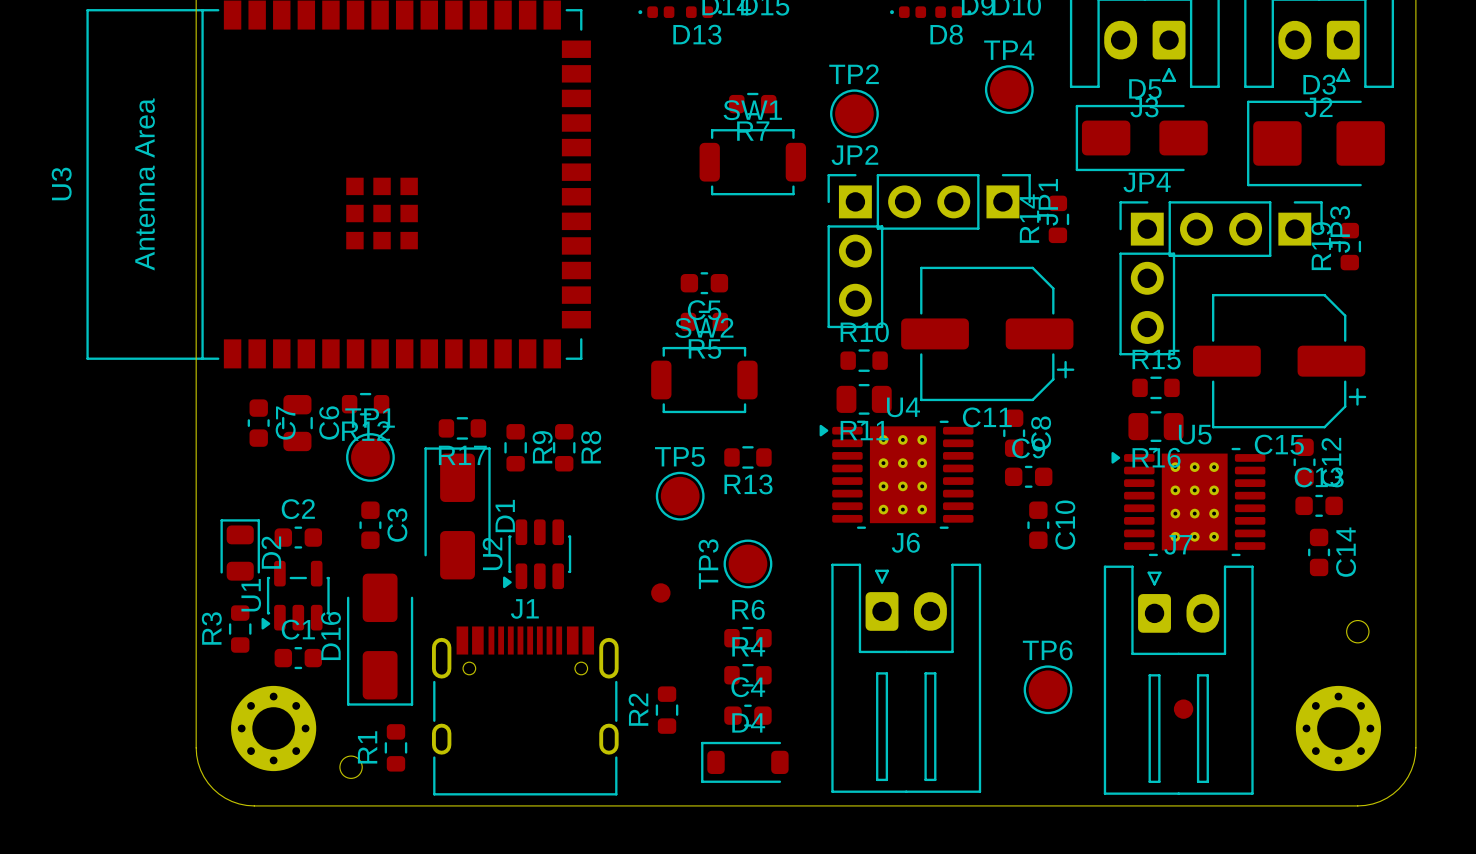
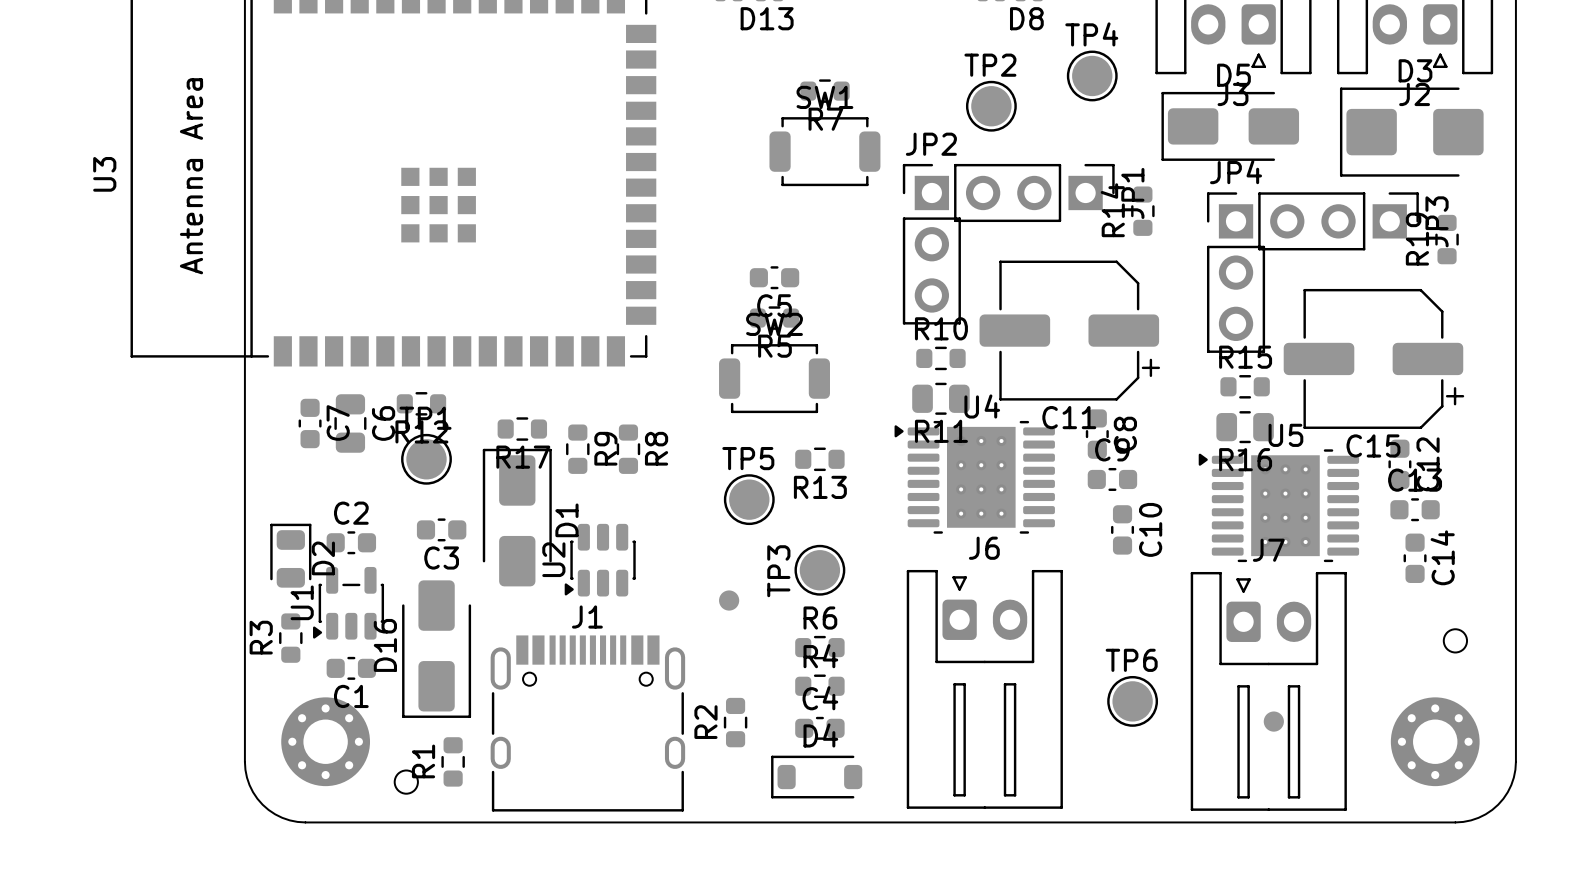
TP2 position: (854, 113) -> (991, 106)
C3 rotation: 0° (370, 525) -> 90° clockwise (441, 529)
C1 name position: C1 (298, 629) -> C1 (351, 696)

